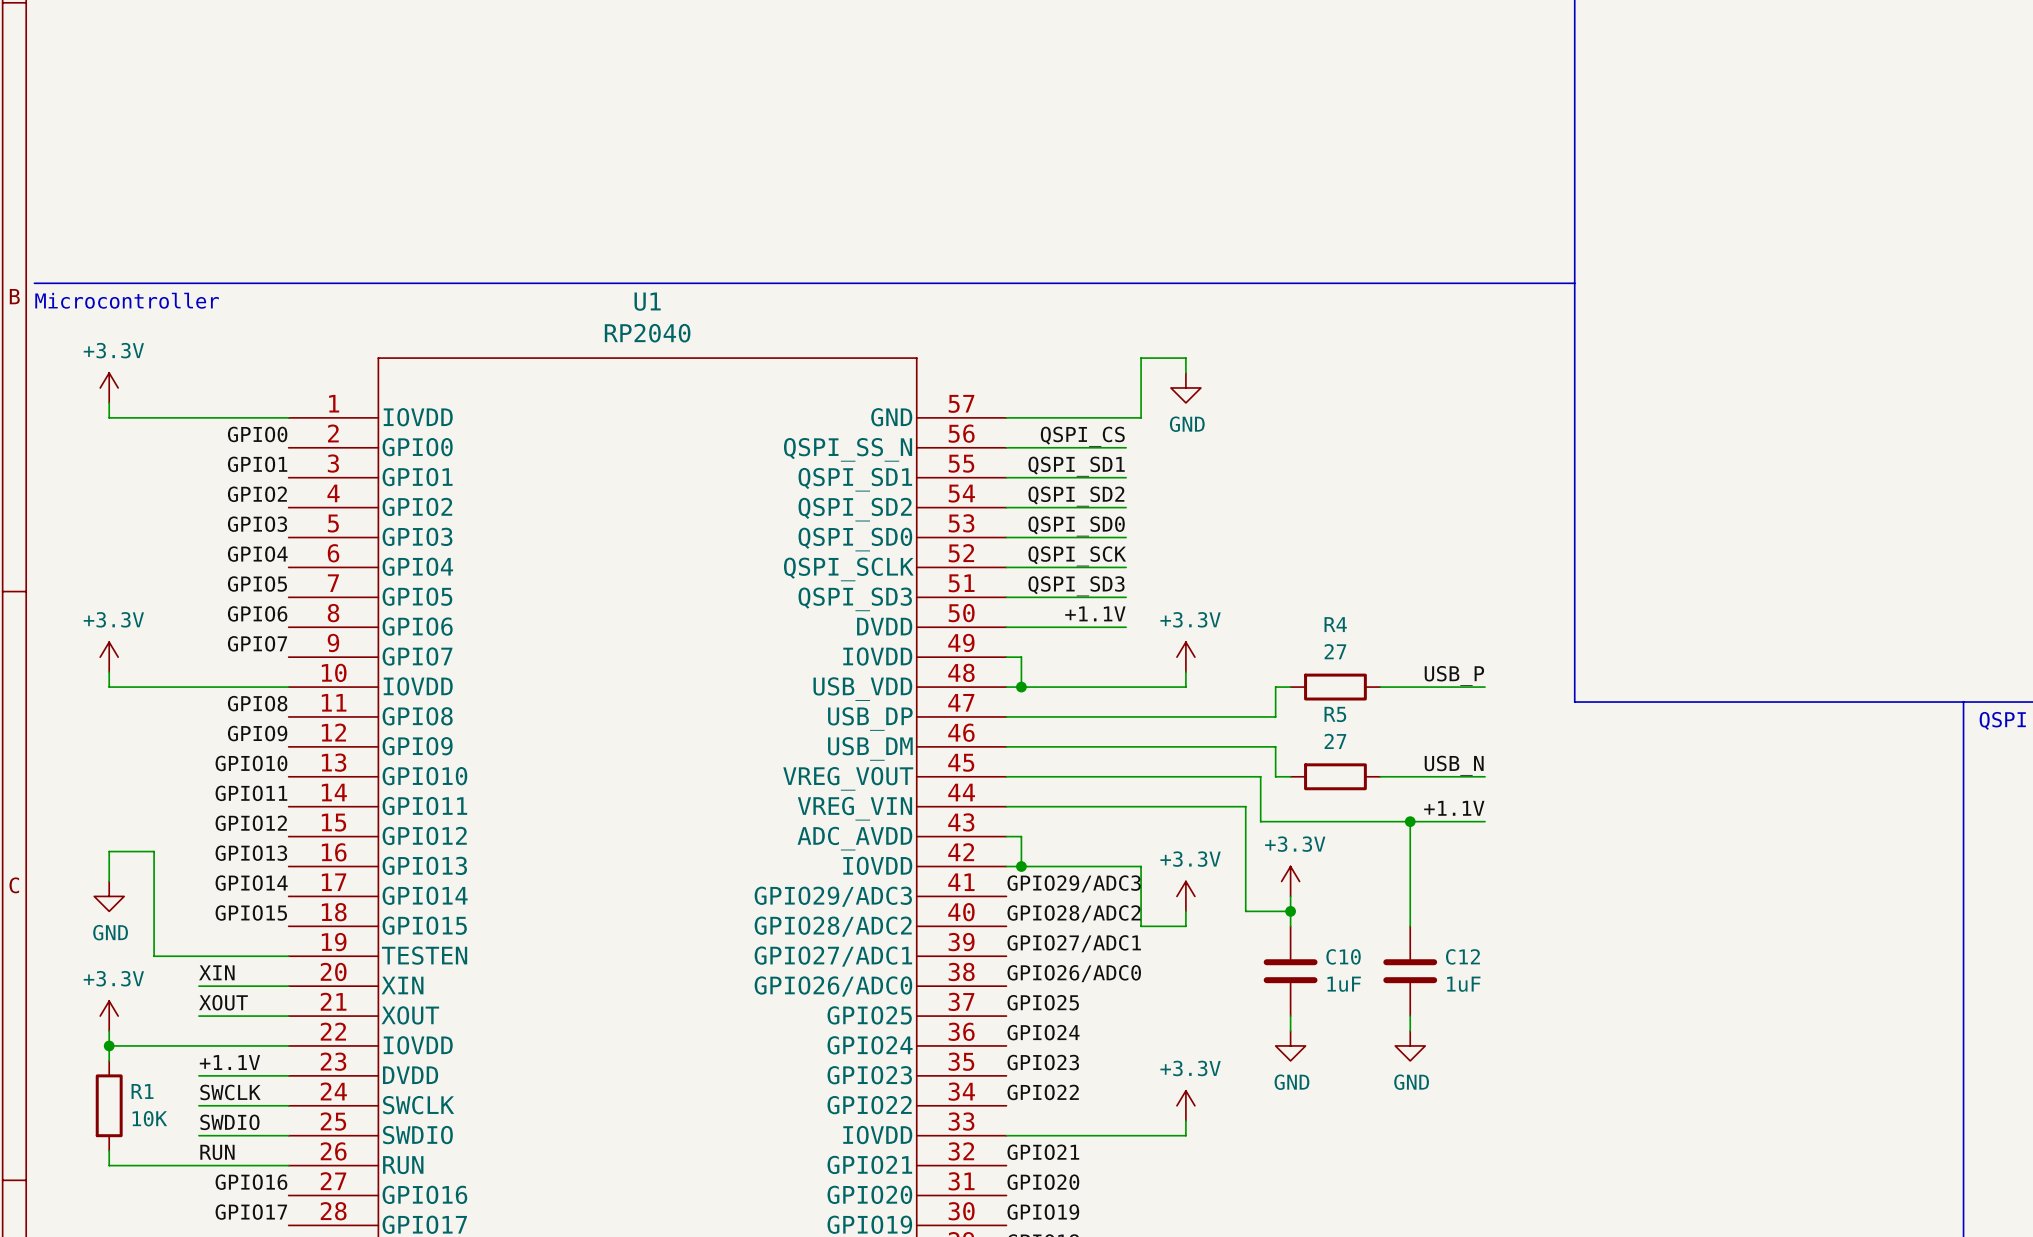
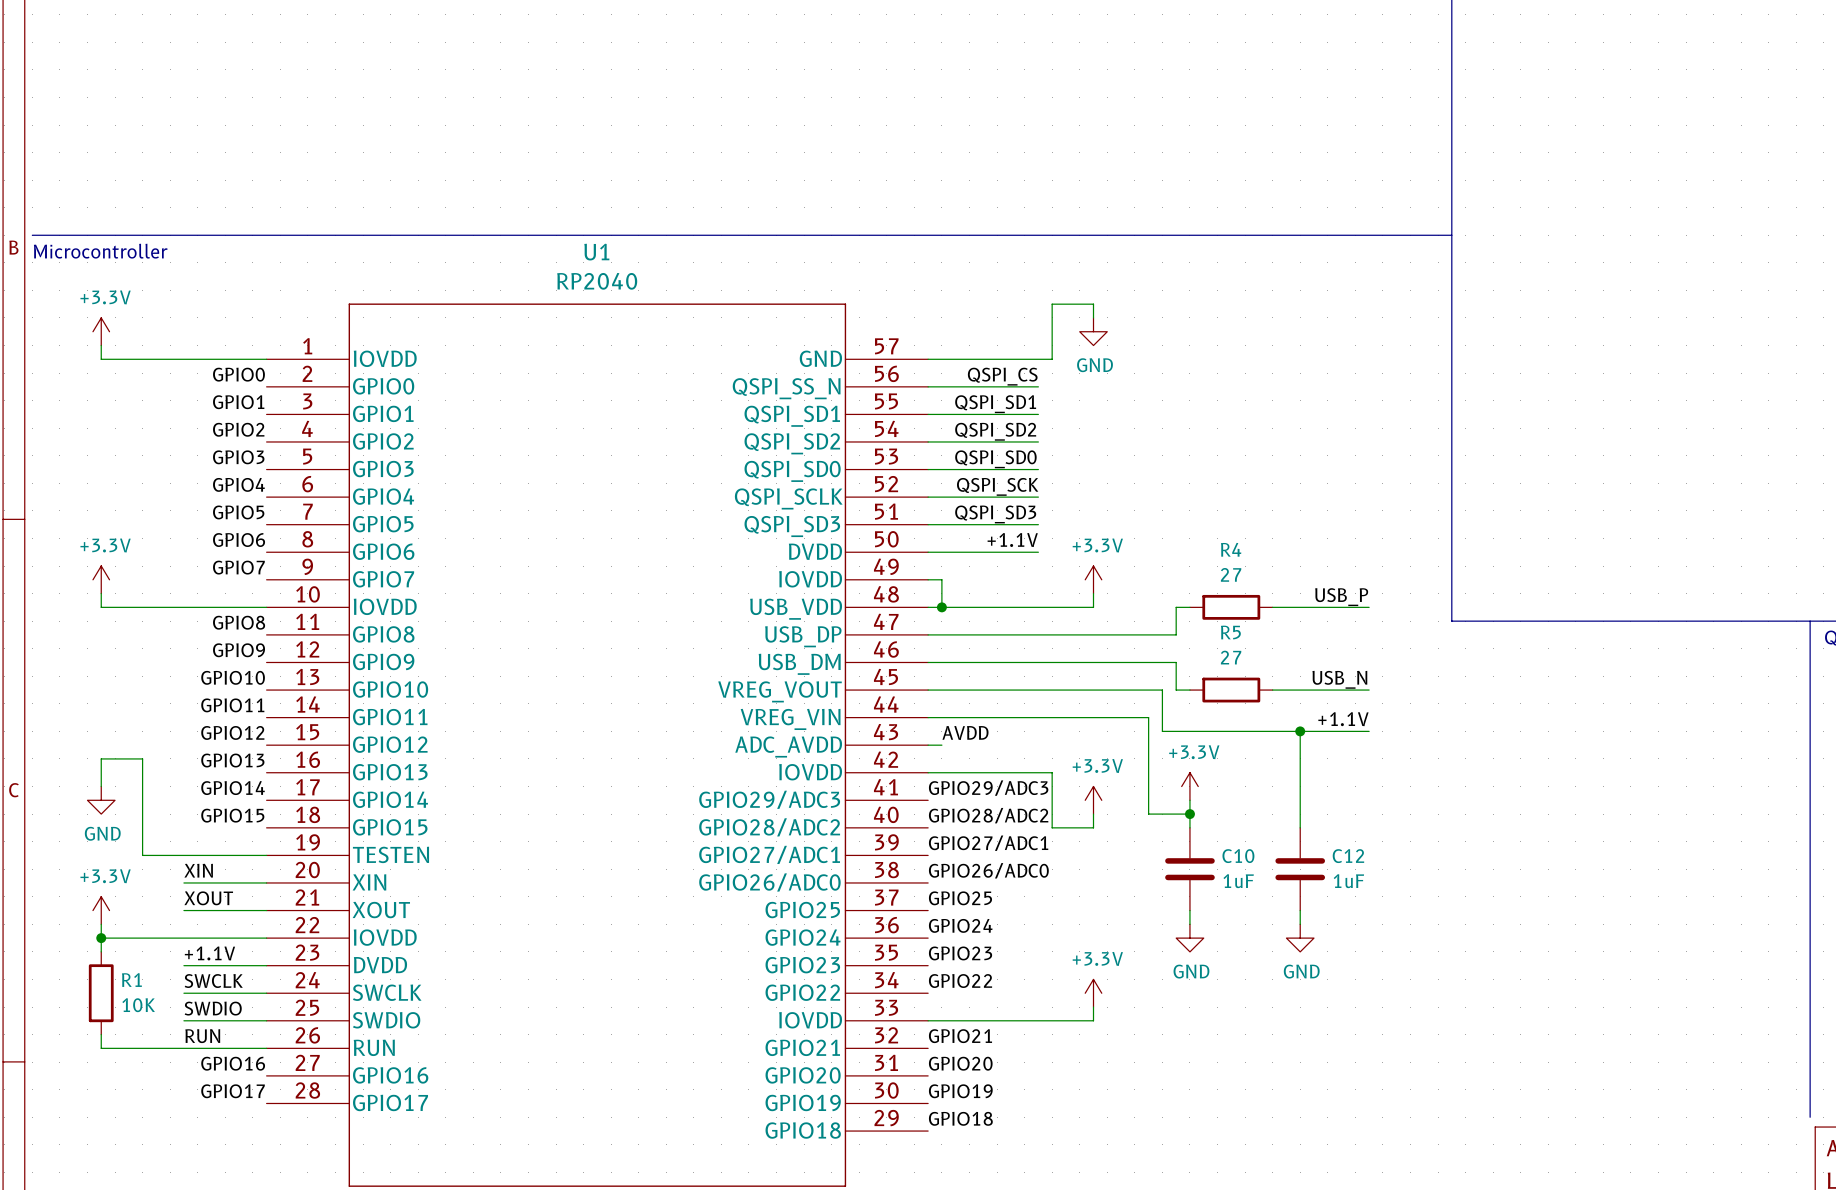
label: none -> AVDD (965, 732)
wire: (1021, 836) (1021, 866) -> none
junction: (1021, 866) -> none

